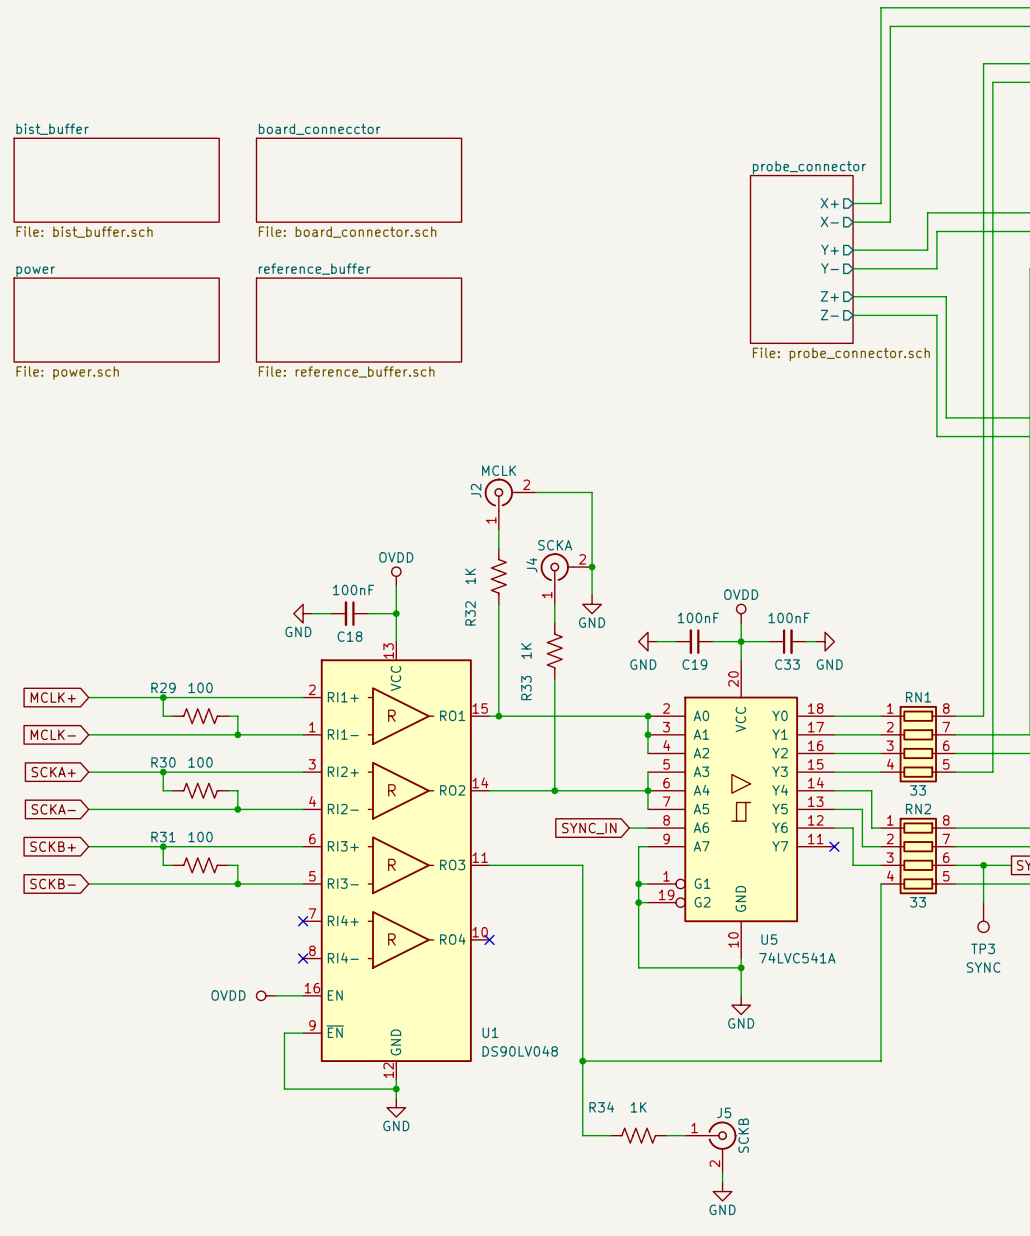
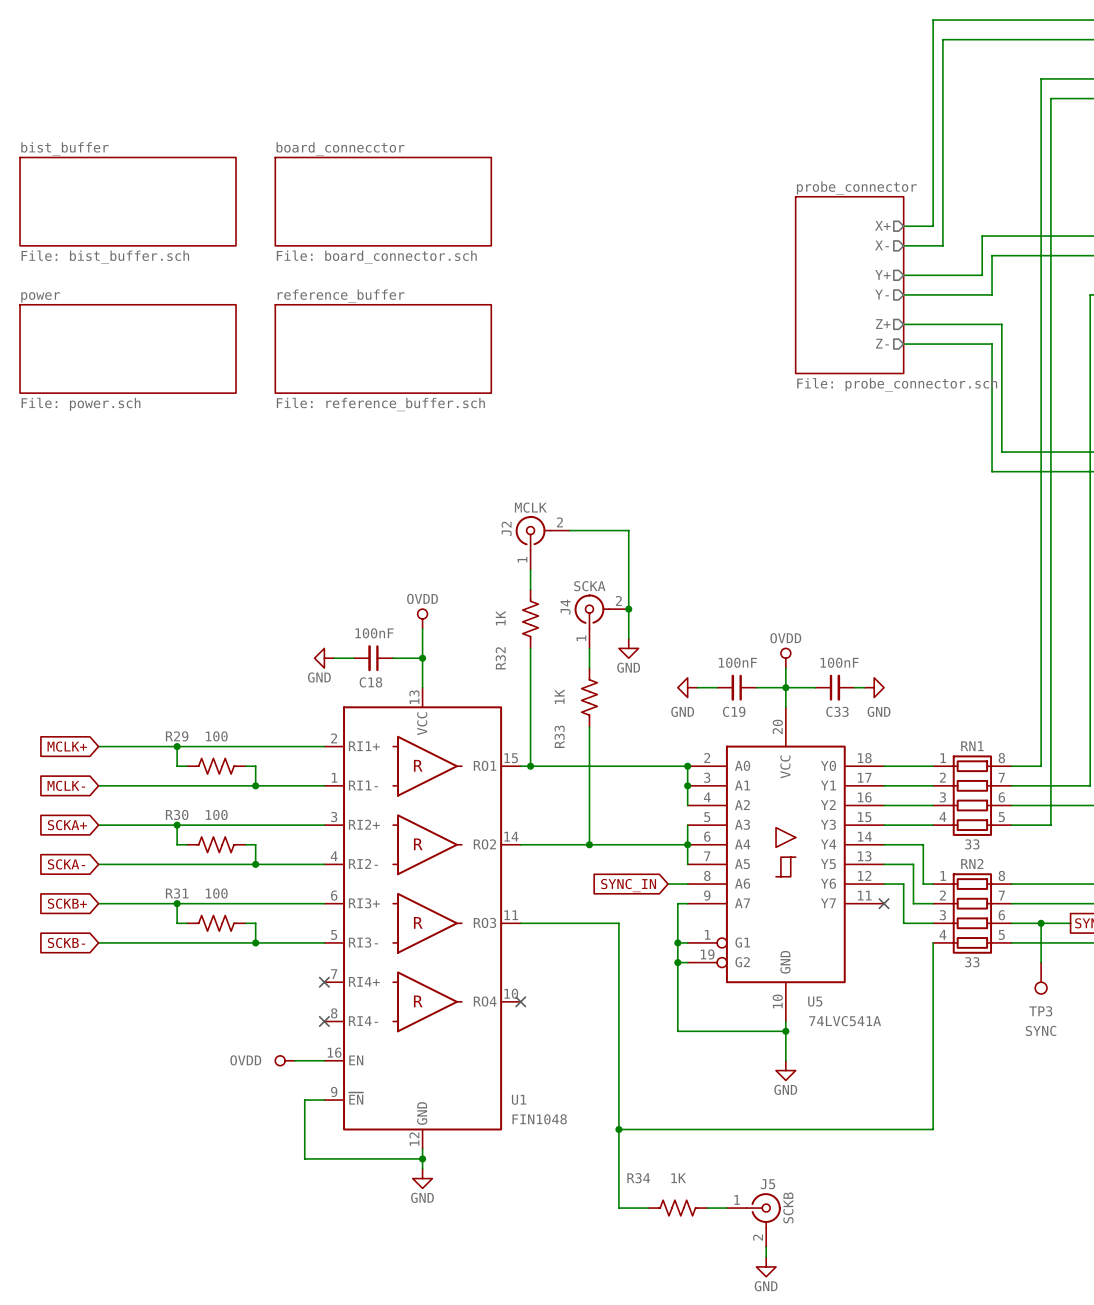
U1 value: DS90LV048 (520, 1051) -> FIN1048 (539, 1119)

